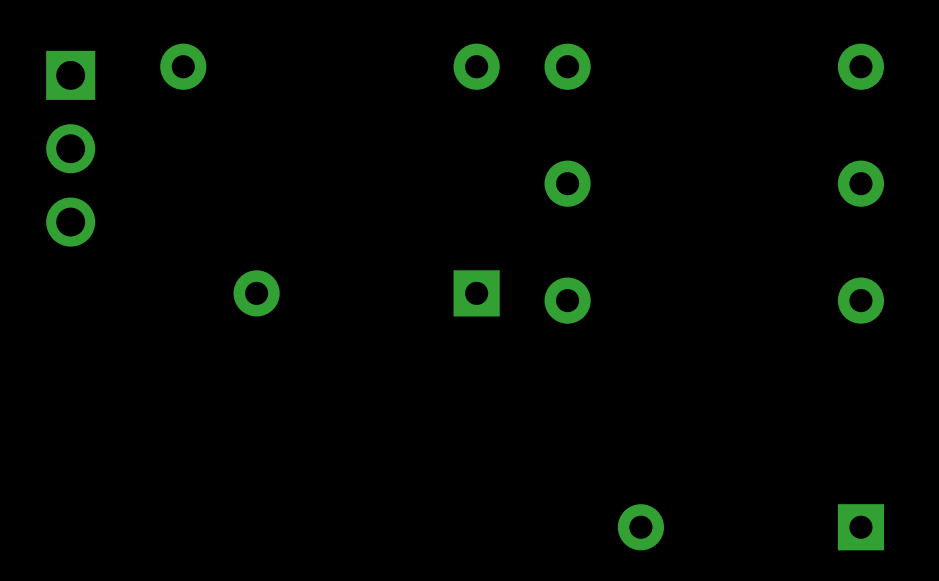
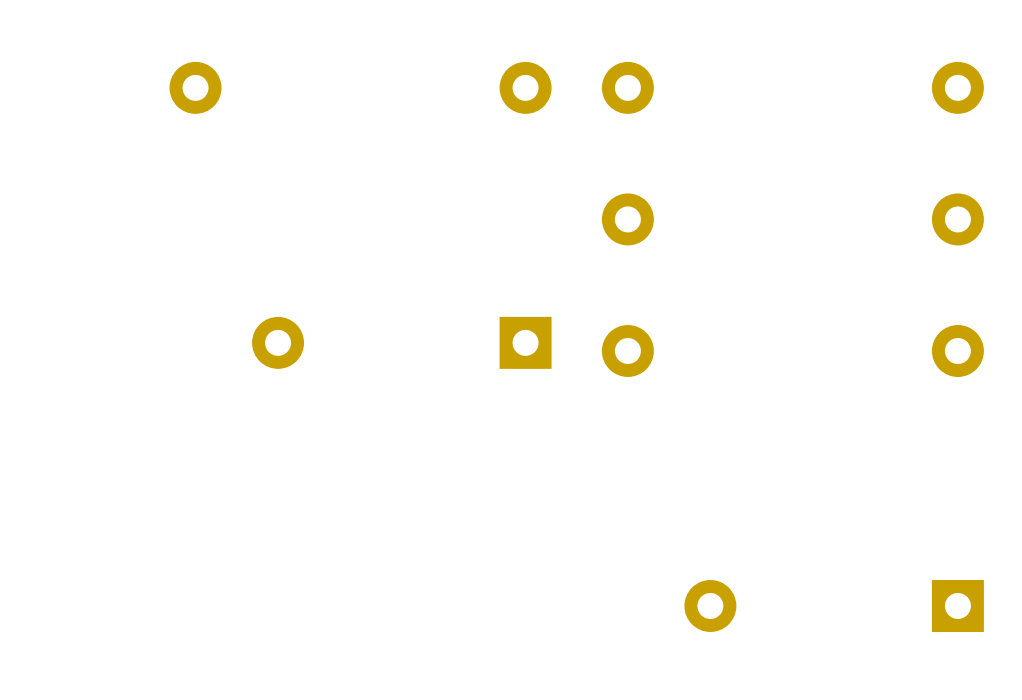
part: (70, 148) -> none

